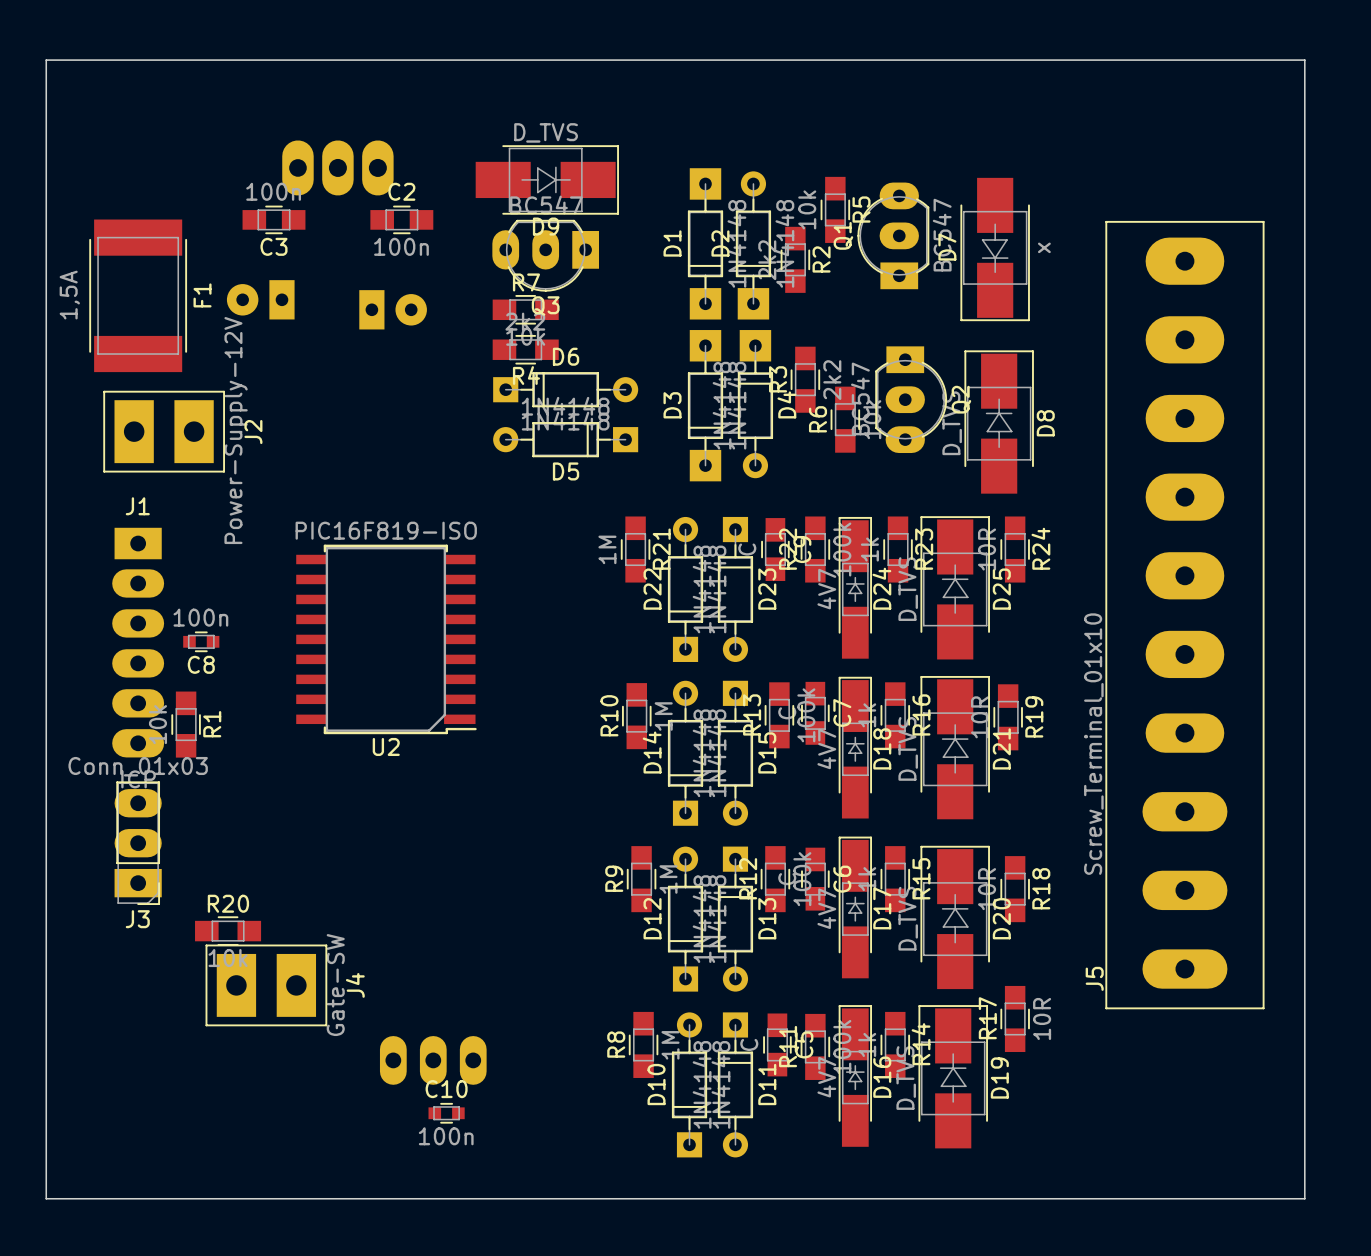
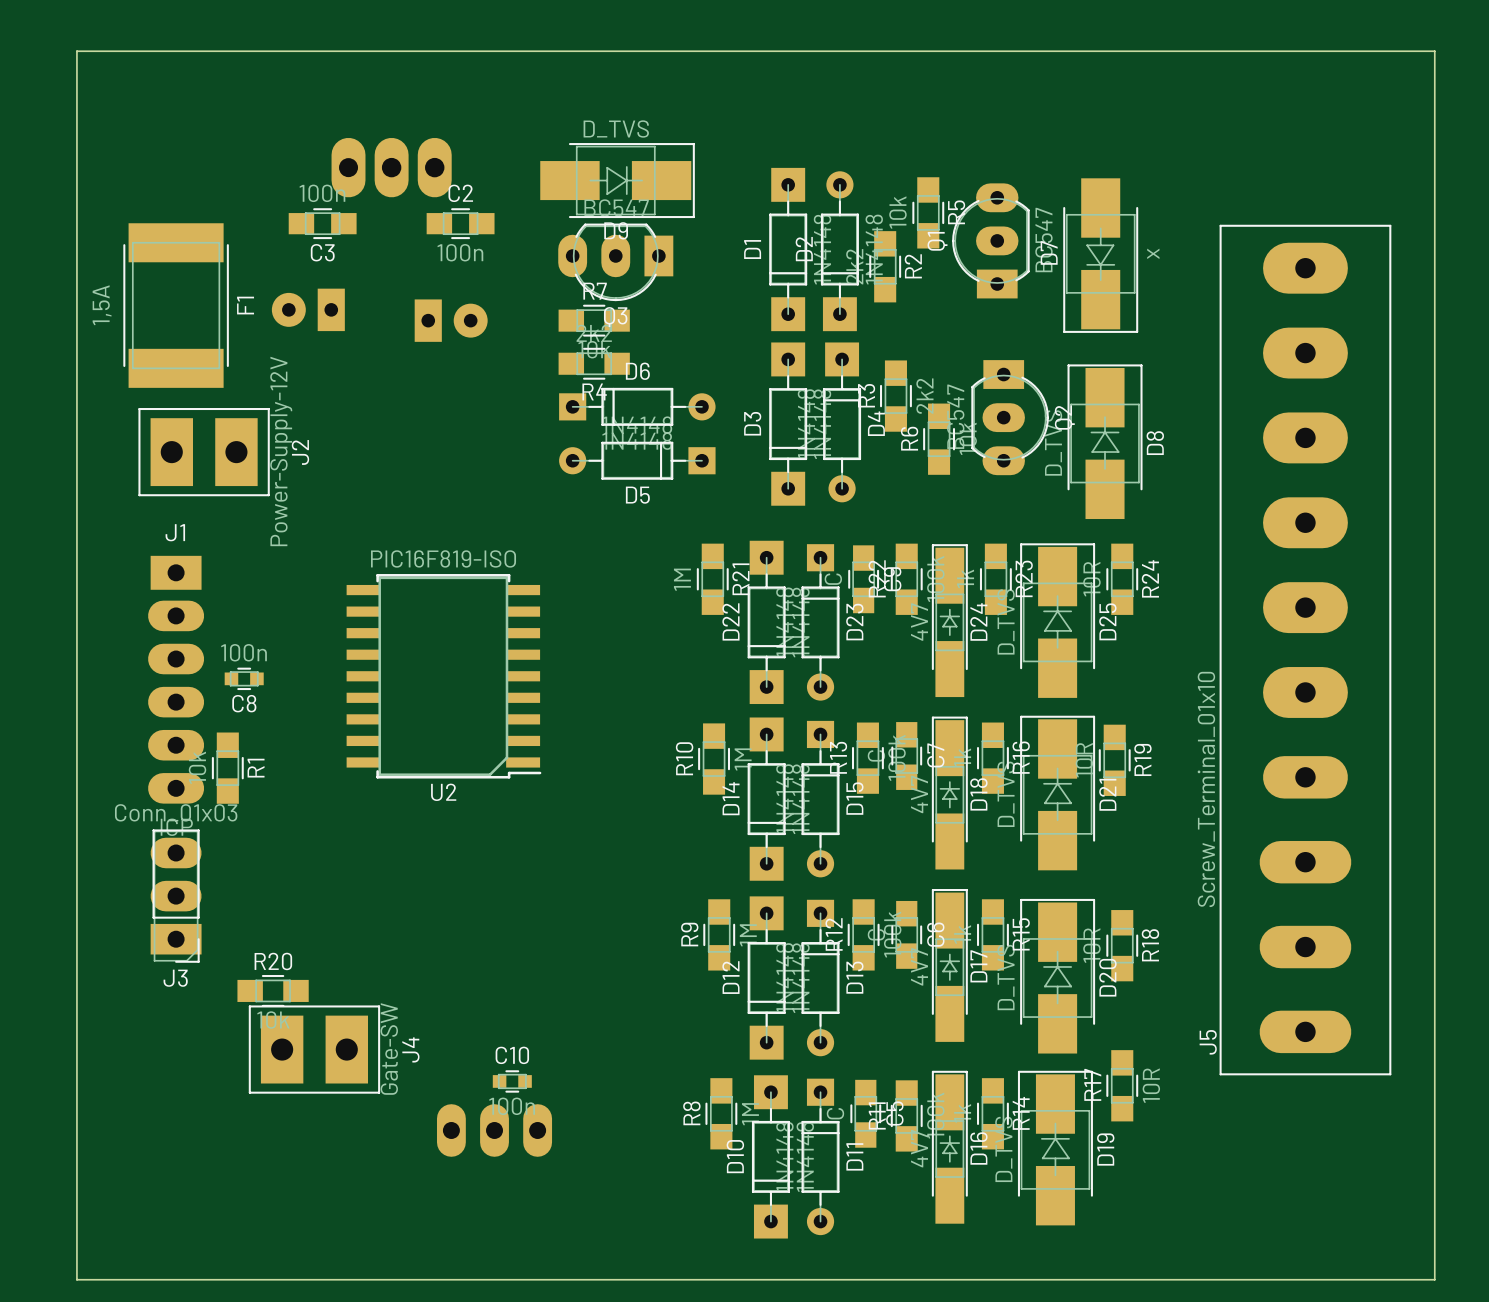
D22 footprint: [667, 516, 704, 662] -> [747, 540, 786, 705]
D14 footprint: [667, 680, 704, 826] -> [747, 717, 786, 881]
D12 footprint: [667, 846, 704, 992] -> [747, 896, 786, 1060]
D10 footprint: [671, 1012, 708, 1158] -> [751, 1075, 790, 1239]
C10 position: (446, 1113) -> (512, 1081)

